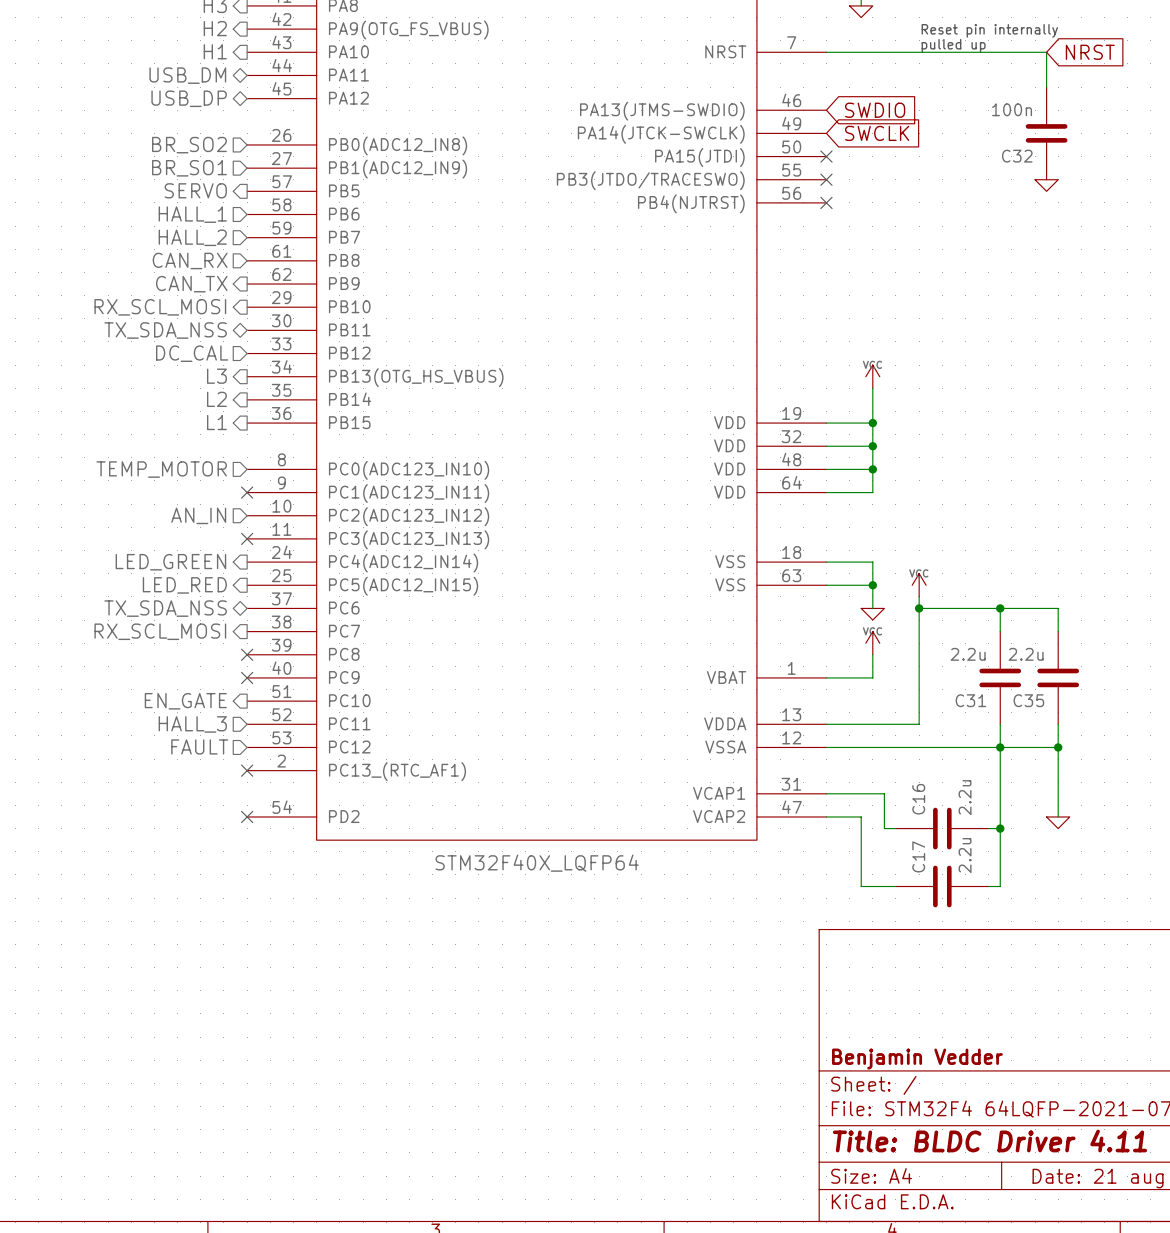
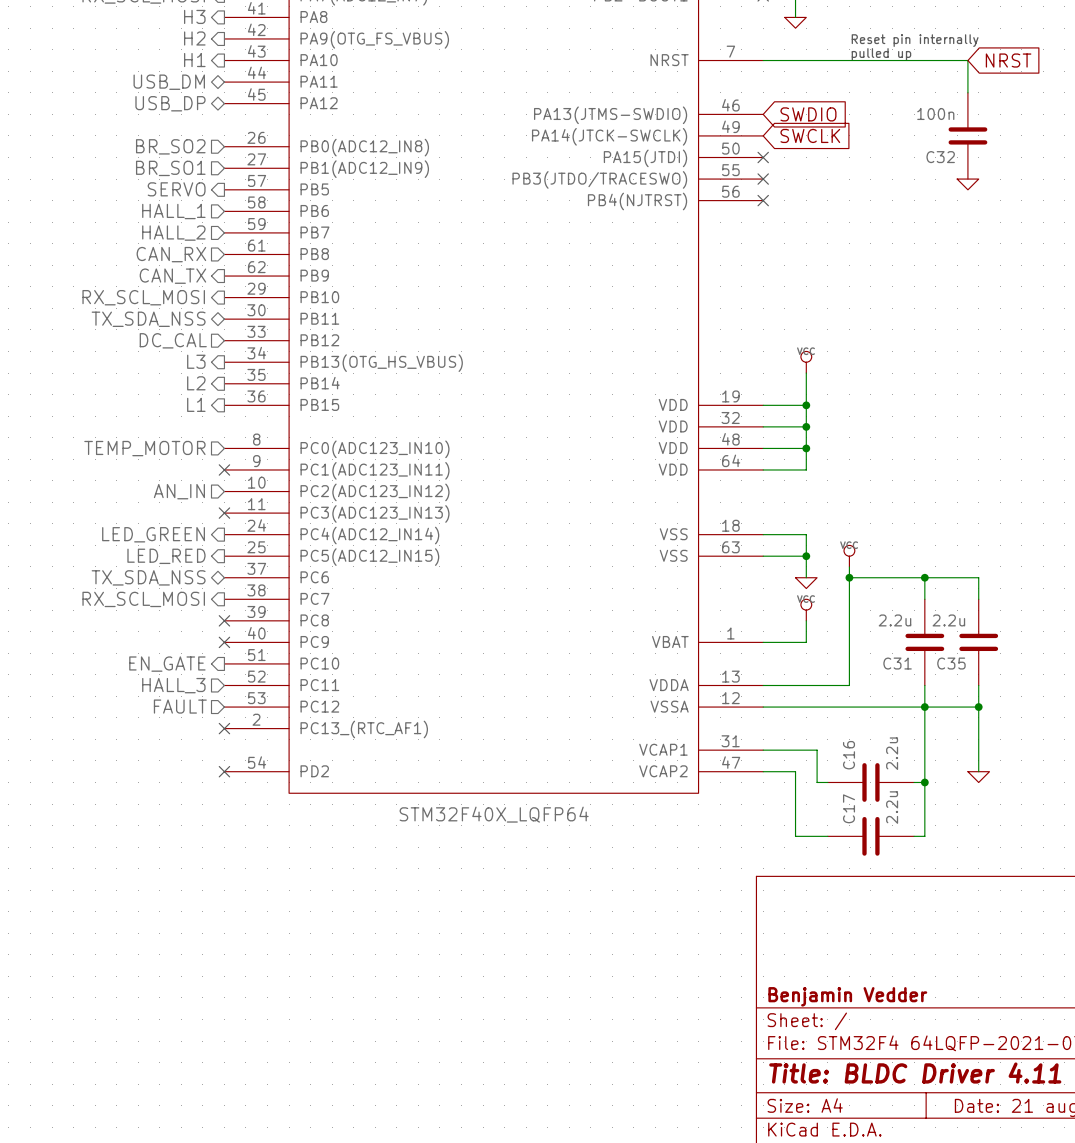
power symbol shape: [865, 365, 880, 389] -> [800, 351, 812, 374]
power symbol shape: [912, 573, 927, 597] -> [844, 545, 855, 567]
power symbol shape: [865, 631, 880, 655] -> [800, 599, 812, 621]

